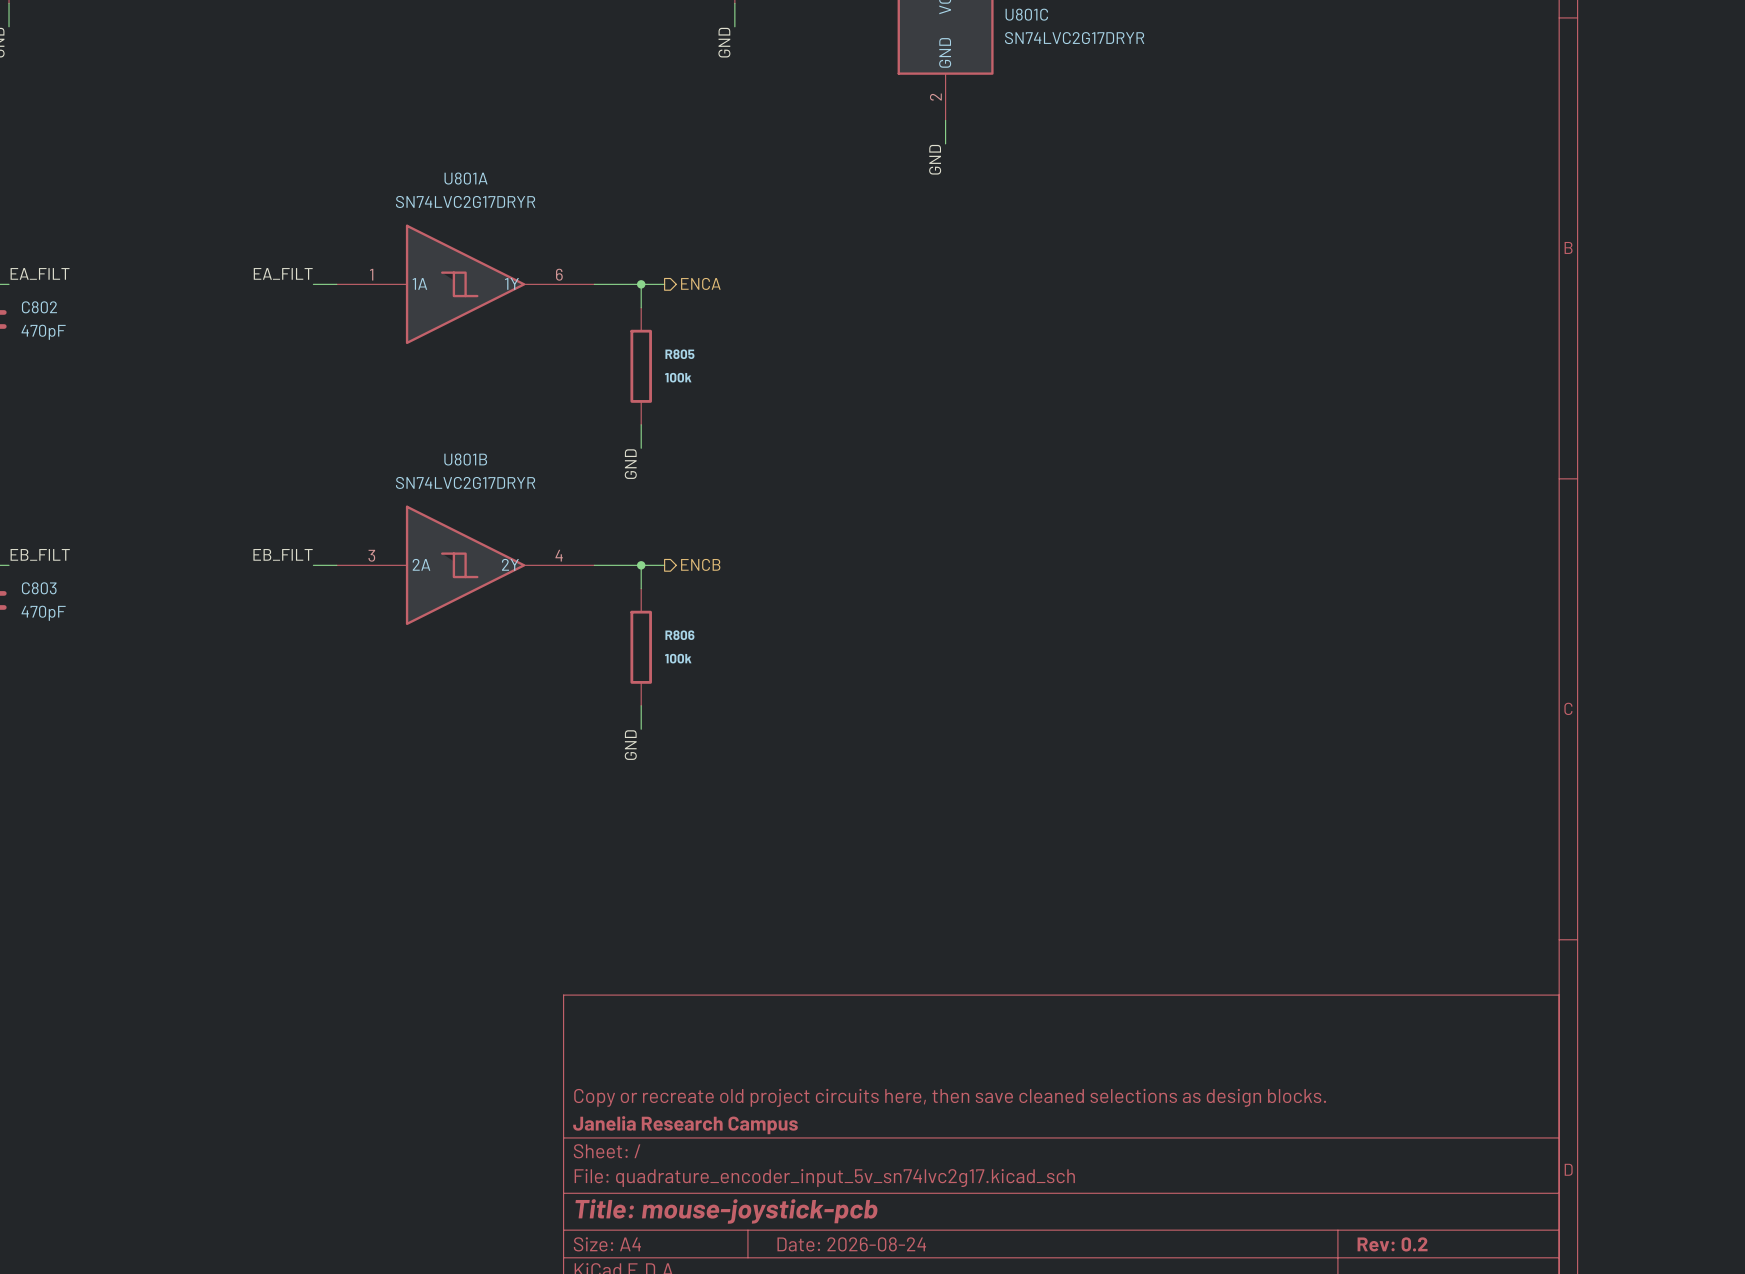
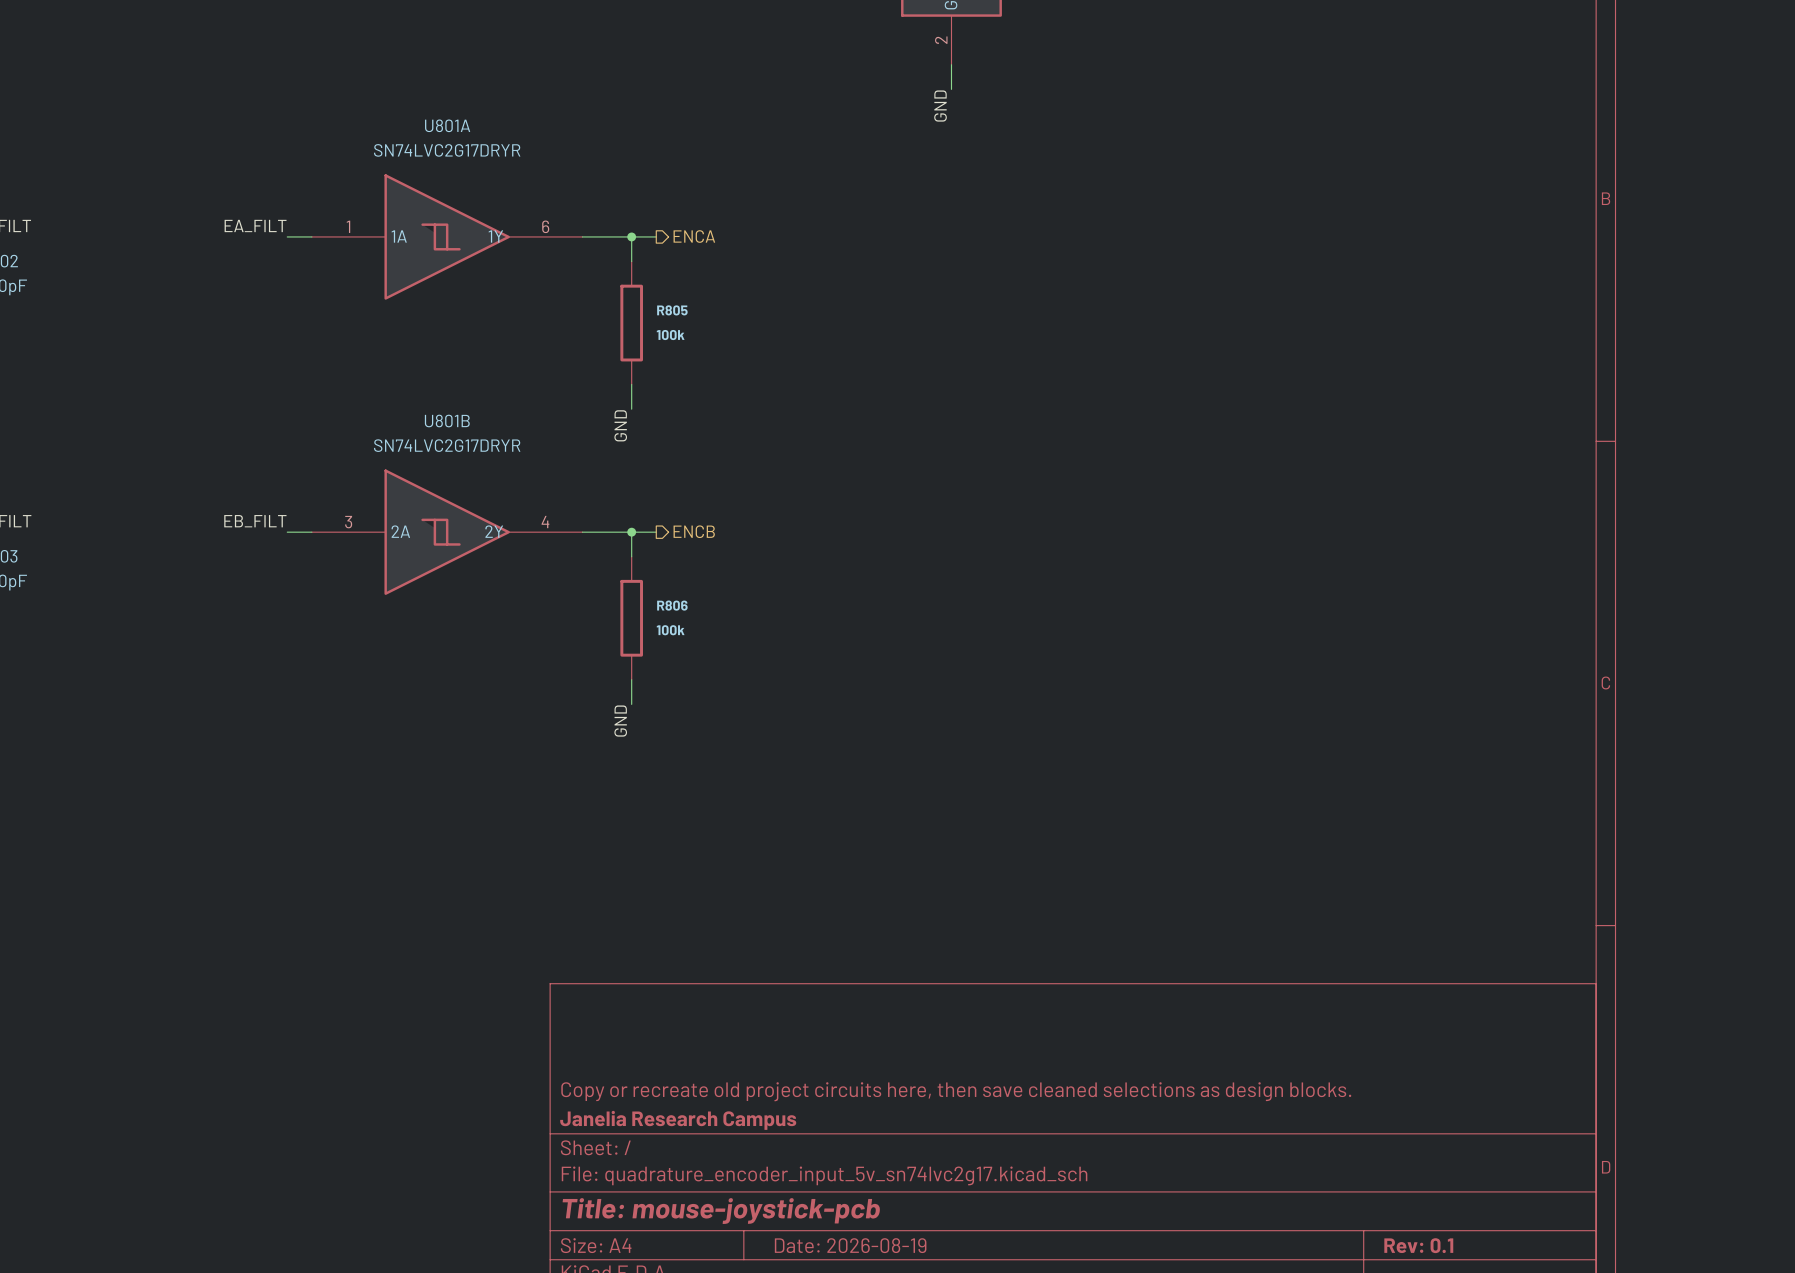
title block: Date: 2026-08-24 (851, 1244) -> Date: 2026-08-19 (850, 1245)
title block: Rev: 0.2 (1392, 1244) -> Rev: 0.1 (1418, 1245)

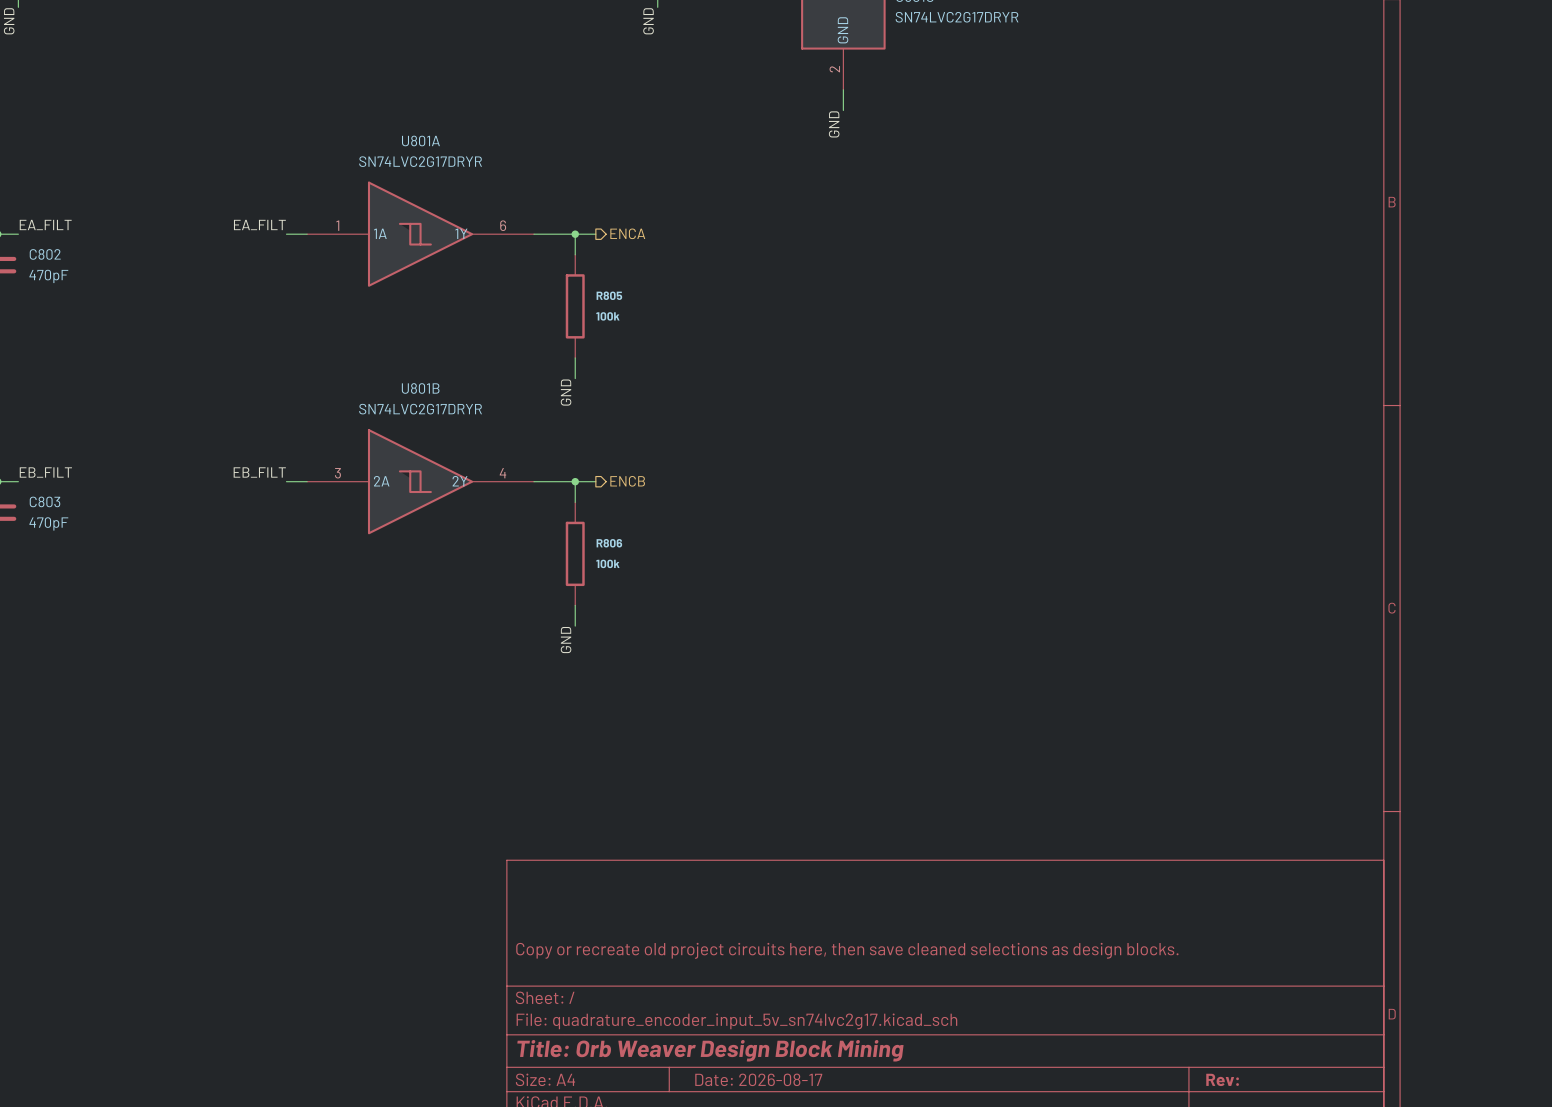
title block: Janelia Research Campus (678, 1120) -> none
title block: Title: mouse-joystick-pcb (721, 1211) -> Title: Orb Weaver Design Block Mining (710, 1050)
title block: Date: 2026-08-19 (850, 1245) -> Date: 2026-08-17 (758, 1079)
title block: Rev: 0.1 (1418, 1245) -> Rev: (1222, 1079)

